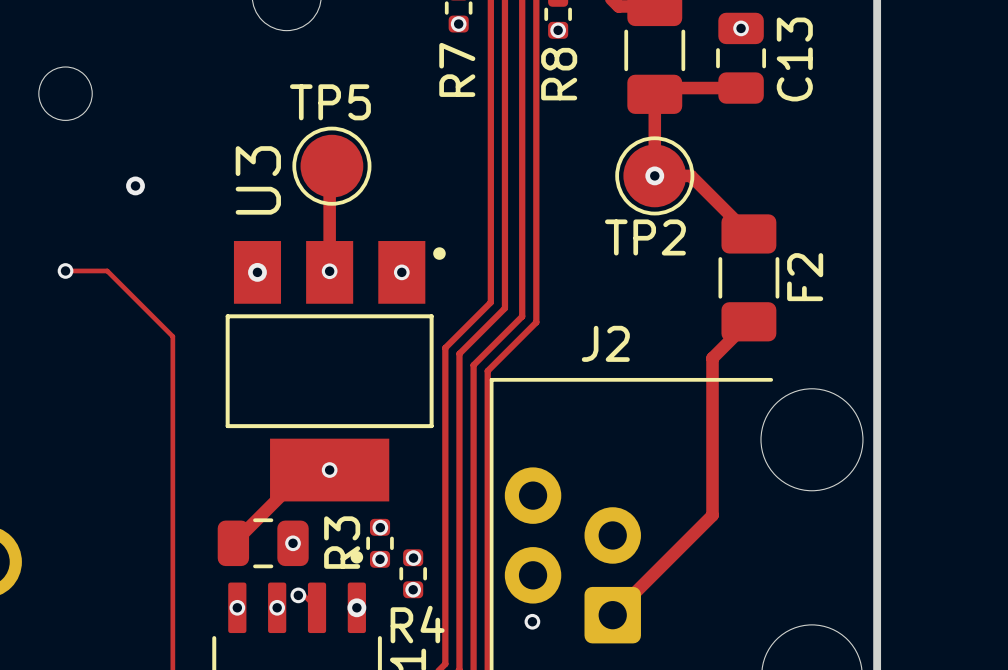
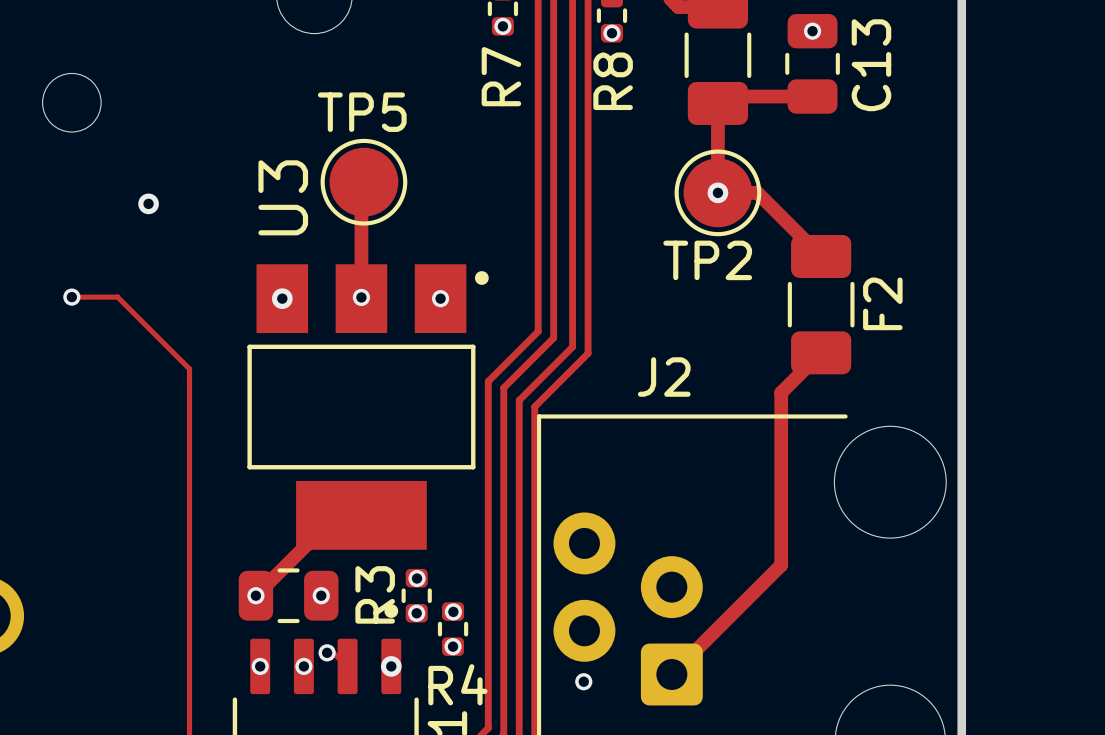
via position: (329, 470) -> (255, 595)

